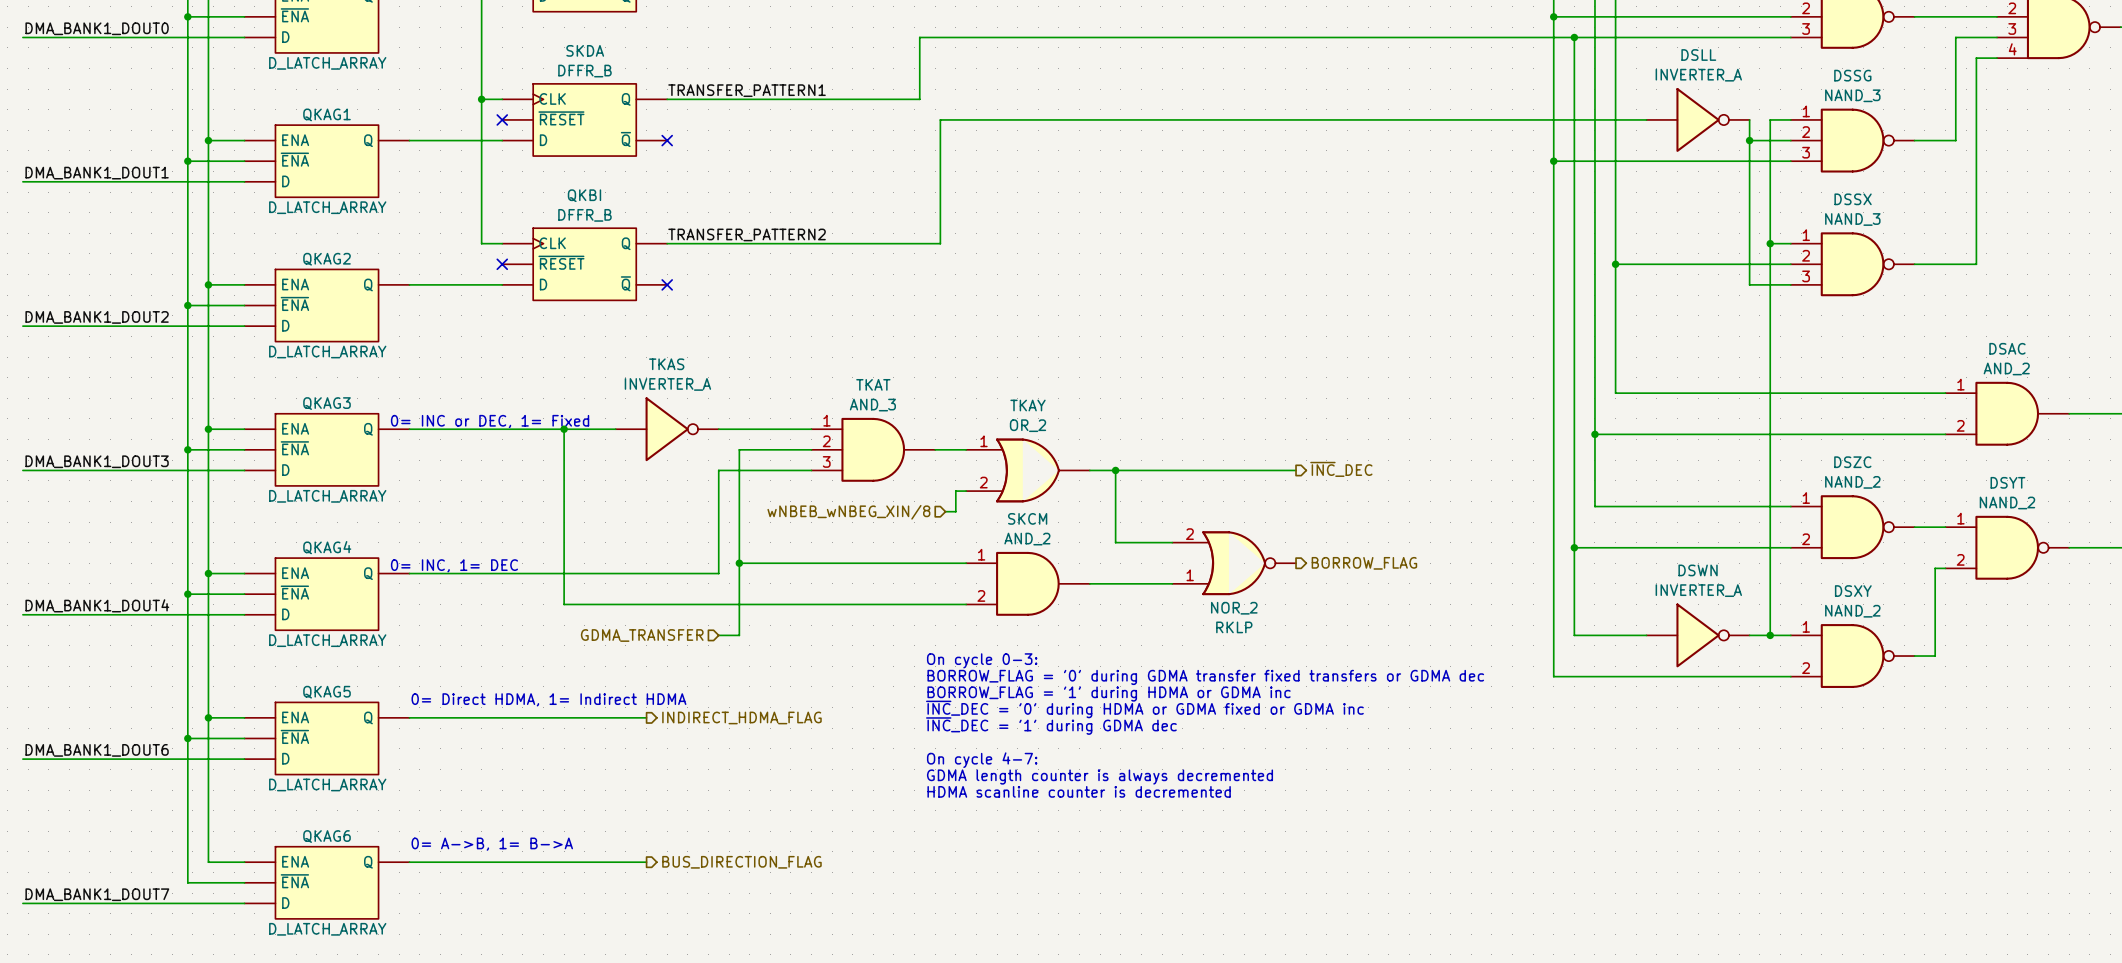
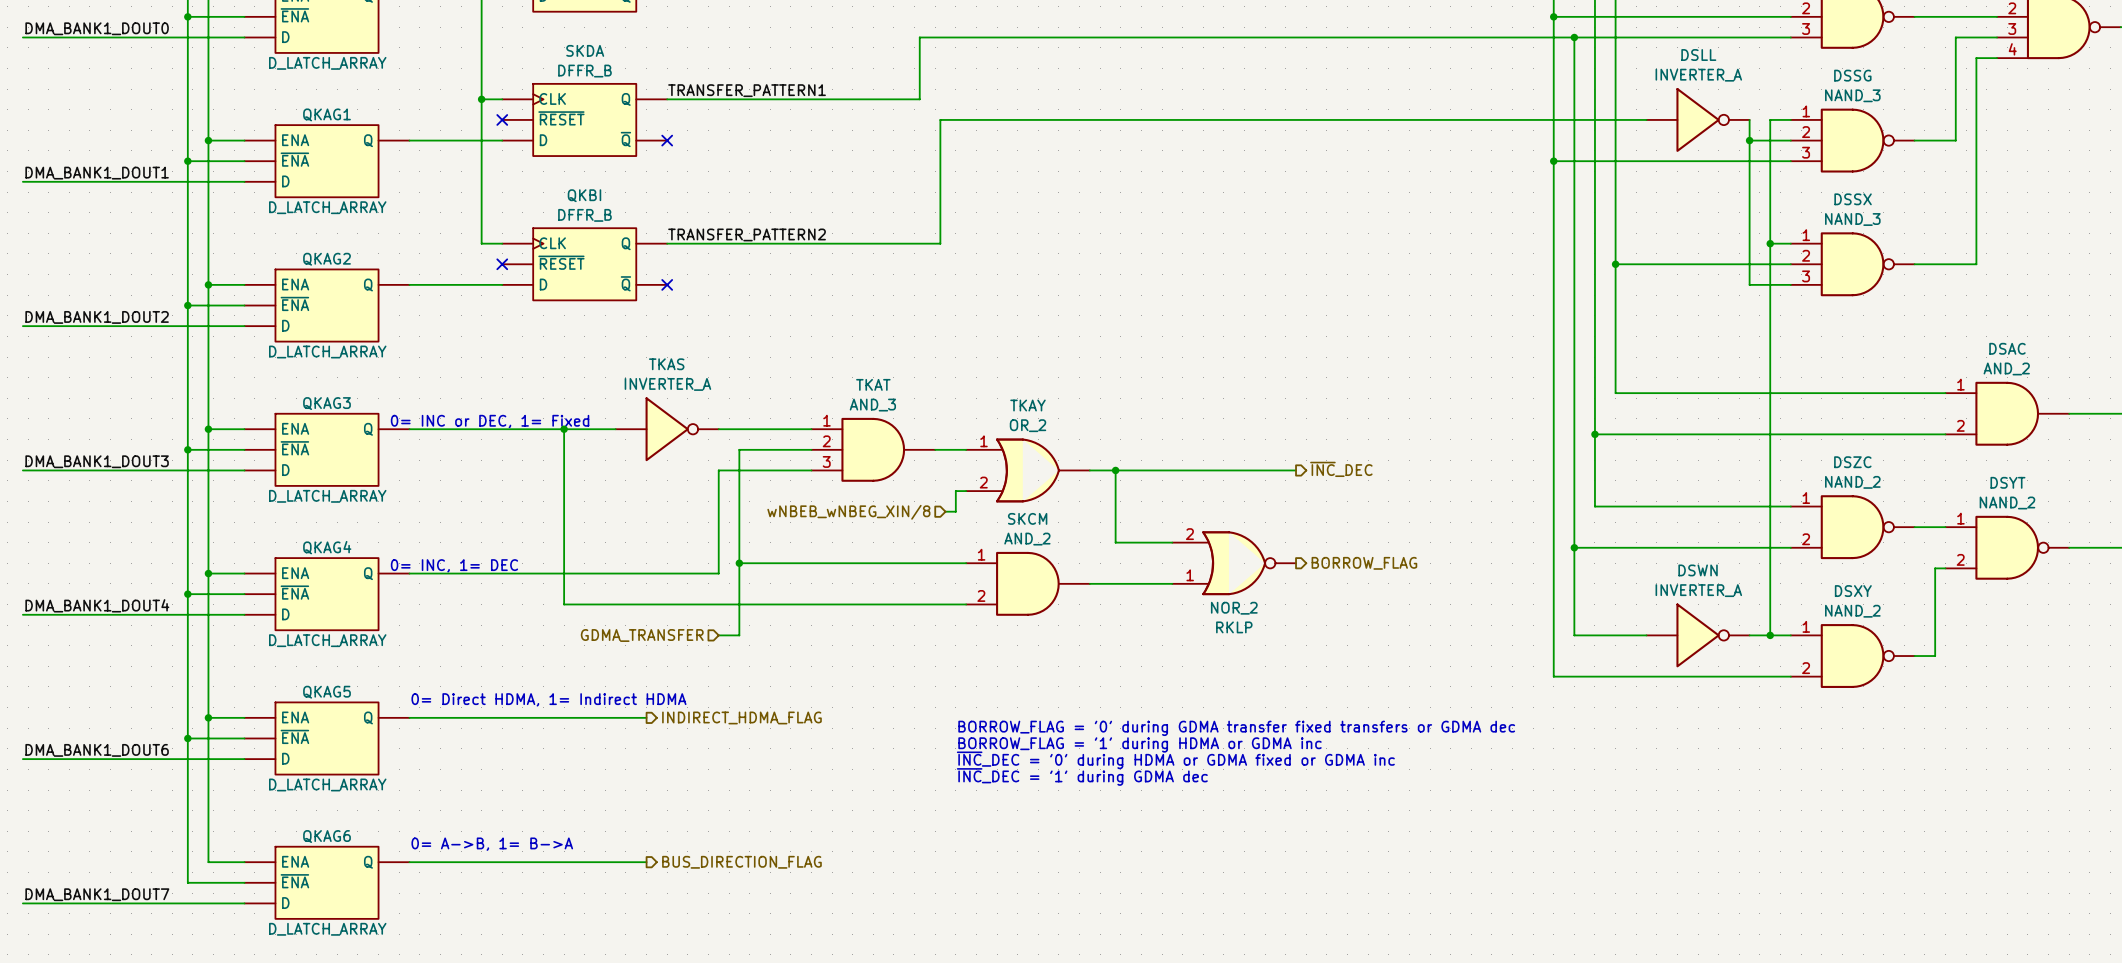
text: On cycle 0-3: (982, 660) -> none
text position: BORROW_FLAG = '0' during GDMA transfer fixed transfers or GDMA dec (1205, 677) -> BORROW_FLAG = '0' during GDMA transfer fixed transfers or GDMA dec (1236, 728)
text position: BORROW_FLAG = '1' during HDMA or GDMA inc (1109, 694) -> BORROW_FLAG = '1' during HDMA or GDMA inc (1140, 744)
text position: ~{INC}_DEC = '0' during HDMA or GDMA fixed or GDMA inc (1144, 709) -> ~{INC}_DEC = '0' during HDMA or GDMA fixed or GDMA inc (1175, 760)
text position: ~{INC}_DEC = '1' during GDMA dec (1051, 726) -> ~{INC}_DEC = '1' during GDMA dec (1082, 776)
text: On cycle 4-7: (982, 760) -> none
text: GDMA length counter is always decremented (1099, 777) -> none
text: HDMA scanline counter is decremented (1079, 791) -> none

